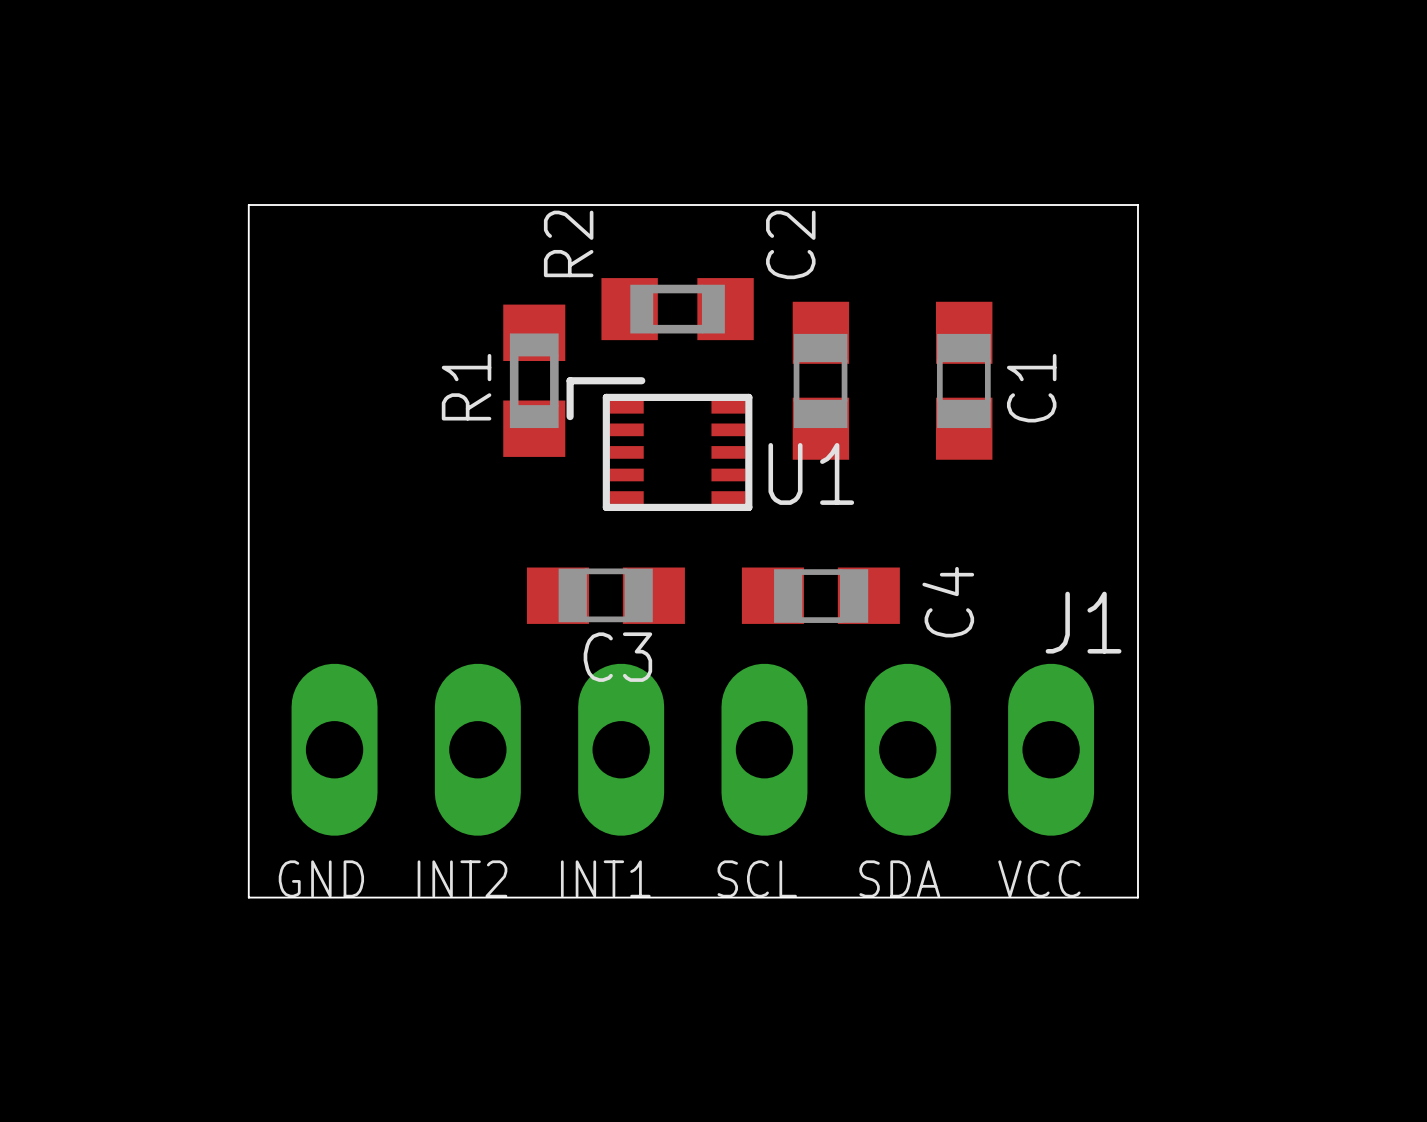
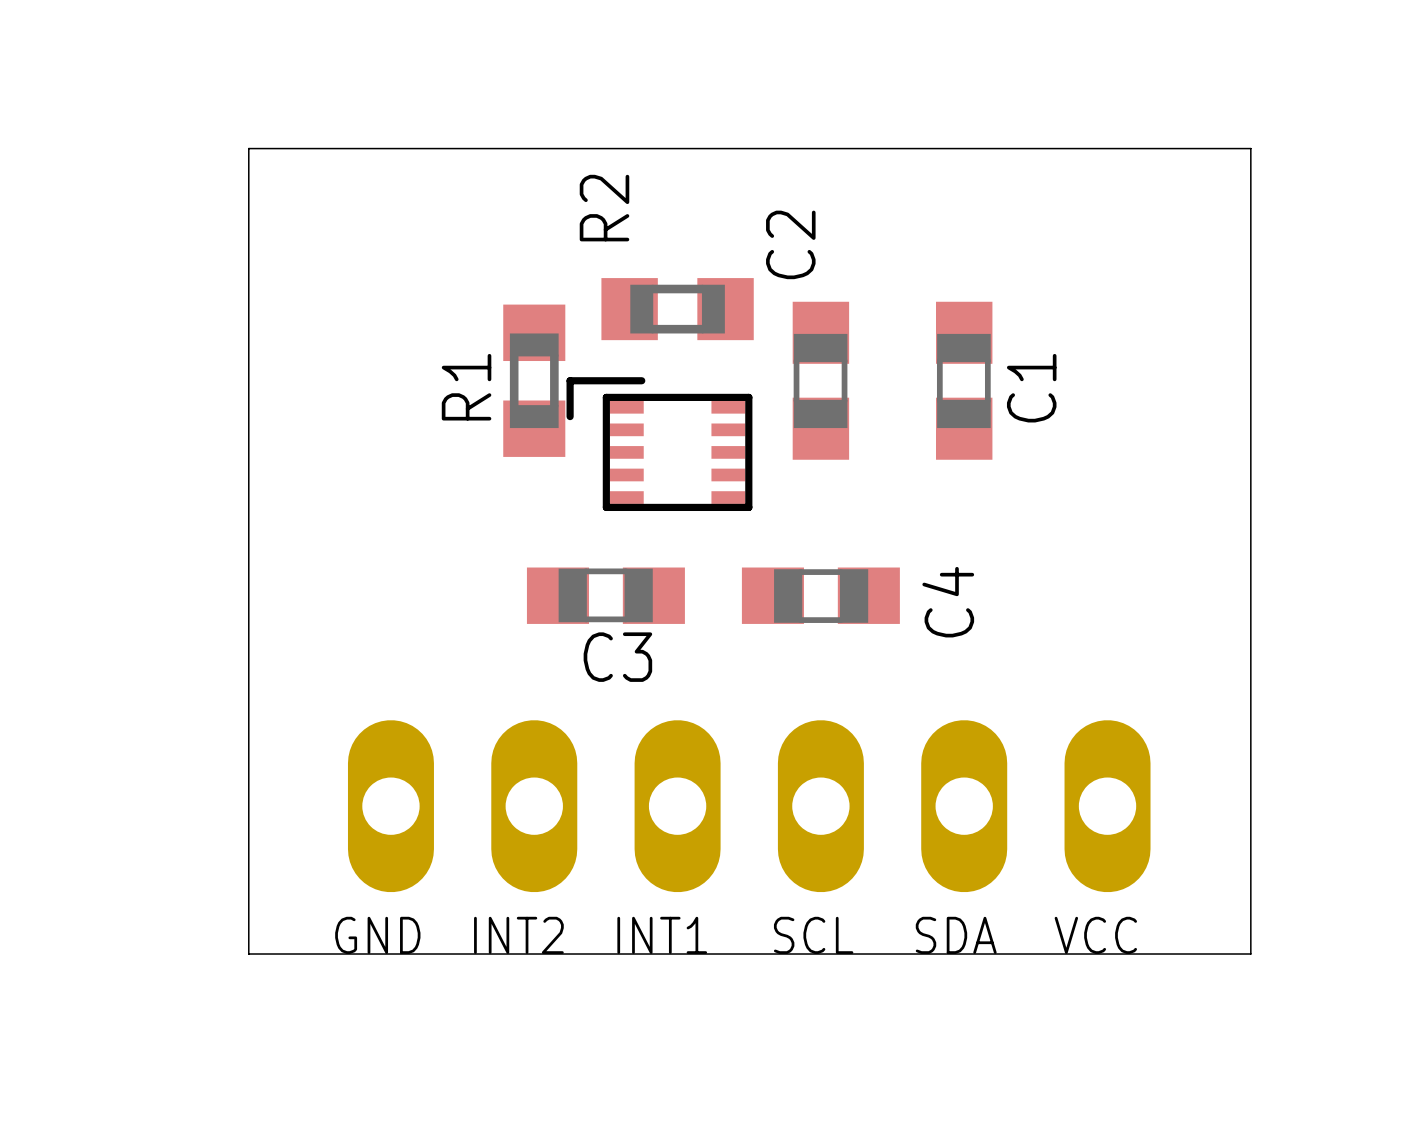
board edge: (248, 205) (1137, 205) (1137, 897) (248, 897) -> (248, 205) (248, 148) (1250, 148) (1250, 954) (248, 954) (248, 897)
R2 name position: R2 (568, 243) -> R2 (604, 208)
text: U1 (811, 473) -> none
text: J1 (1083, 622) -> none
part position: (692, 749) -> (749, 806)
text position: GND (321, 878) -> GND (377, 935)
text position: INT2 (462, 878) -> INT2 (518, 935)
text position: INT1 (605, 878) -> INT1 (662, 935)
text position: SCL (757, 878) -> SCL (813, 935)
text position: SDA (899, 878) -> SDA (956, 935)
text position: VCC (1039, 878) -> VCC (1095, 935)

